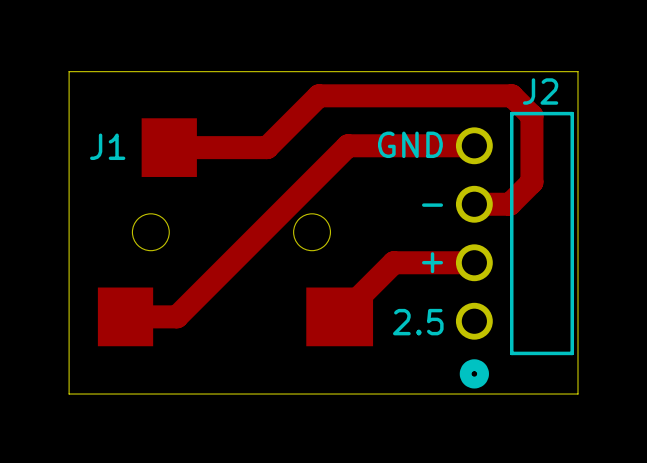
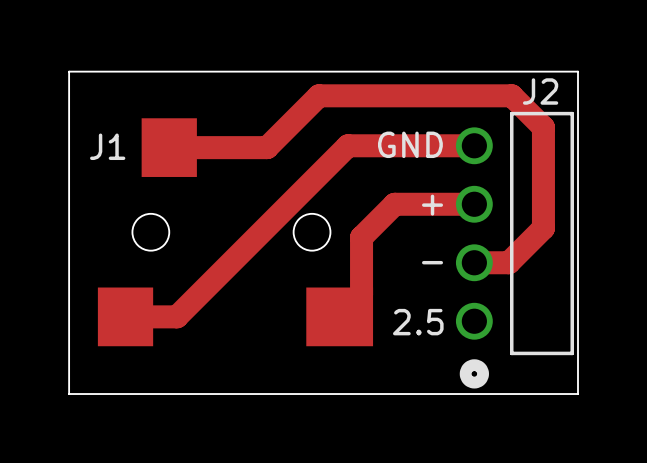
top track: (531, 115) (531, 182) (509, 204) (474, 204) -> (531, 115) (543, 127) (543, 228) (508, 262) (474, 262)
text: - (432, 205) -> + (432, 205)
text: + (432, 262) -> - (432, 262)
top track: (474, 262) (393, 262) (361, 294) -> (474, 204) (394, 204) (361, 237) (361, 294)

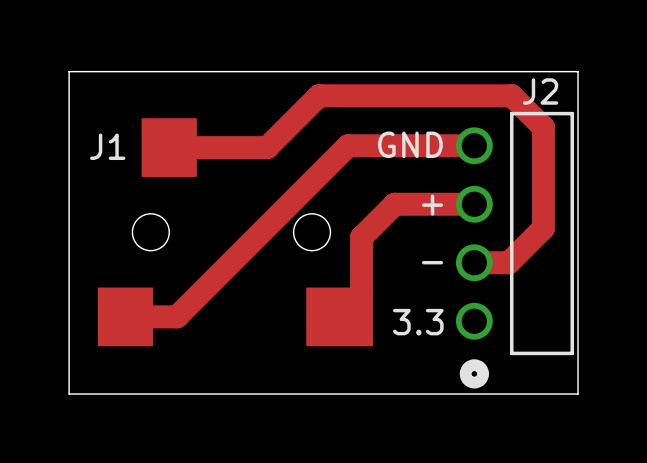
text: 2.5 (418, 322) -> 3.3 (418, 322)

